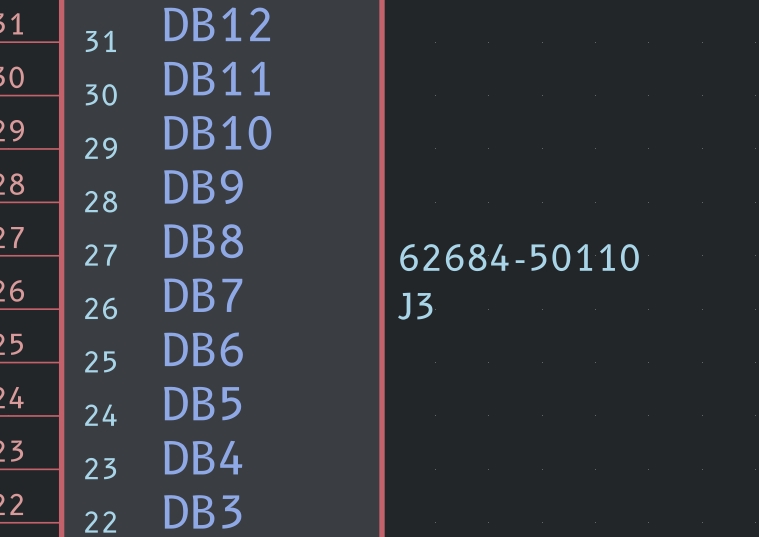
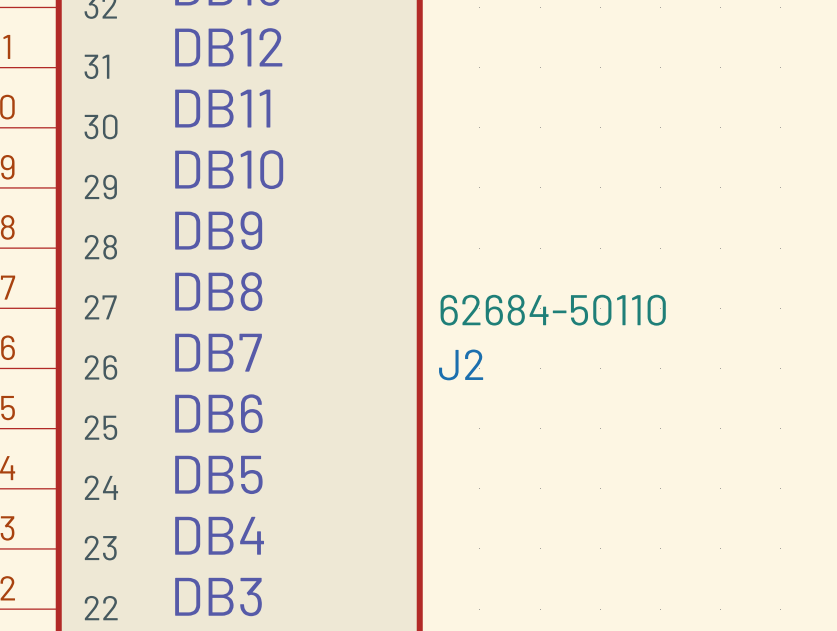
J3 name: J3 (415, 306) -> J2 (461, 364)

